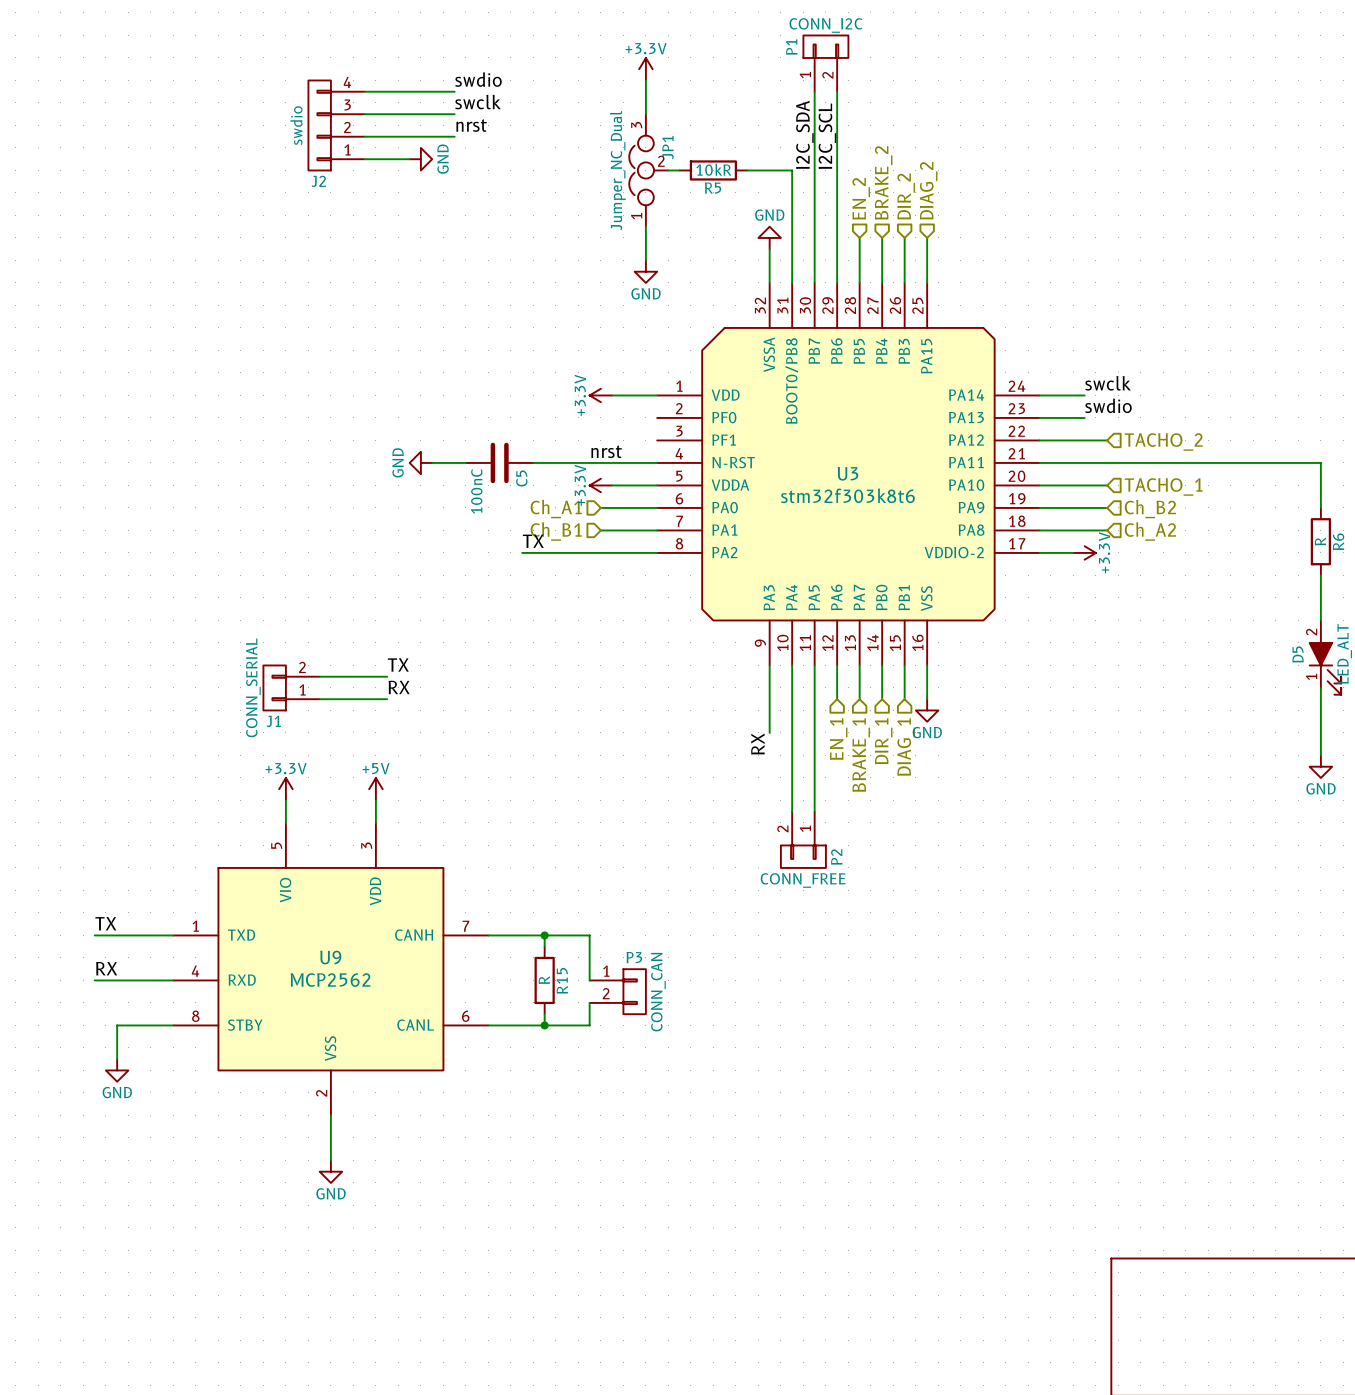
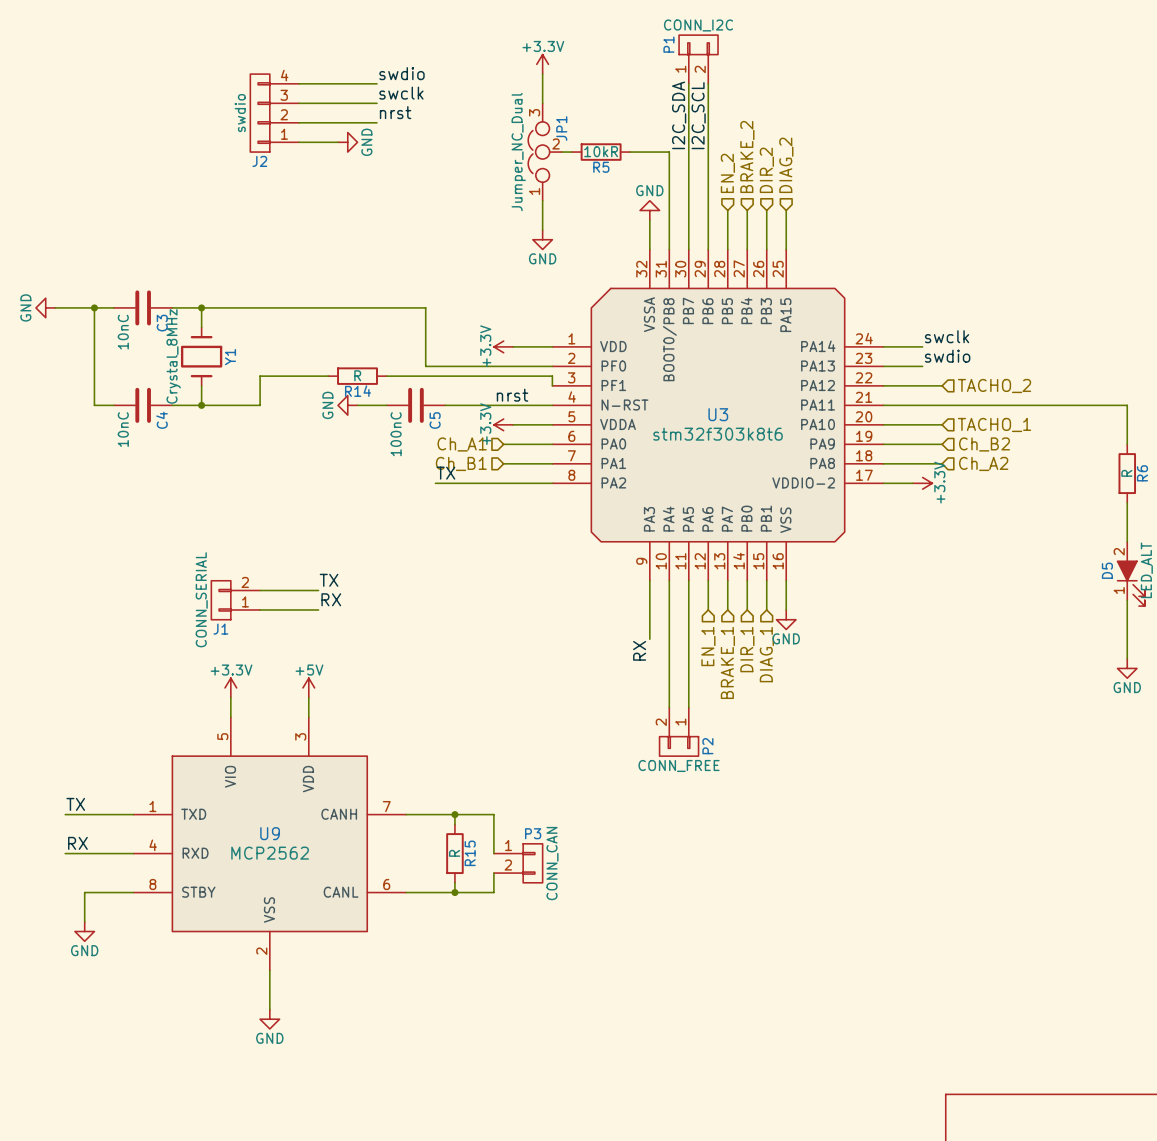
power symbol: none -> GND (45, 307)
wire: none -> (55, 307) (113, 307)
wire: none -> (94, 307) (94, 405) (113, 405)
junction: none -> (94, 307)
C3: none -> 10nC (143, 307)
wire: none -> (172, 307) (425, 307) (425, 366) (552, 366)
wire: none -> (201, 307) (201, 327)
junction: none -> (201, 307)
Y1: none -> Crystal_8MHz (201, 356)
wire: none -> (328, 376) (260, 376) (260, 405) (172, 405)
R14: none -> R (357, 376)
wire: none -> (386, 376) (552, 376) (552, 385)
wire: none -> (201, 385) (201, 405)
C4: none -> 10nC (143, 405)
junction: none -> (201, 405)

